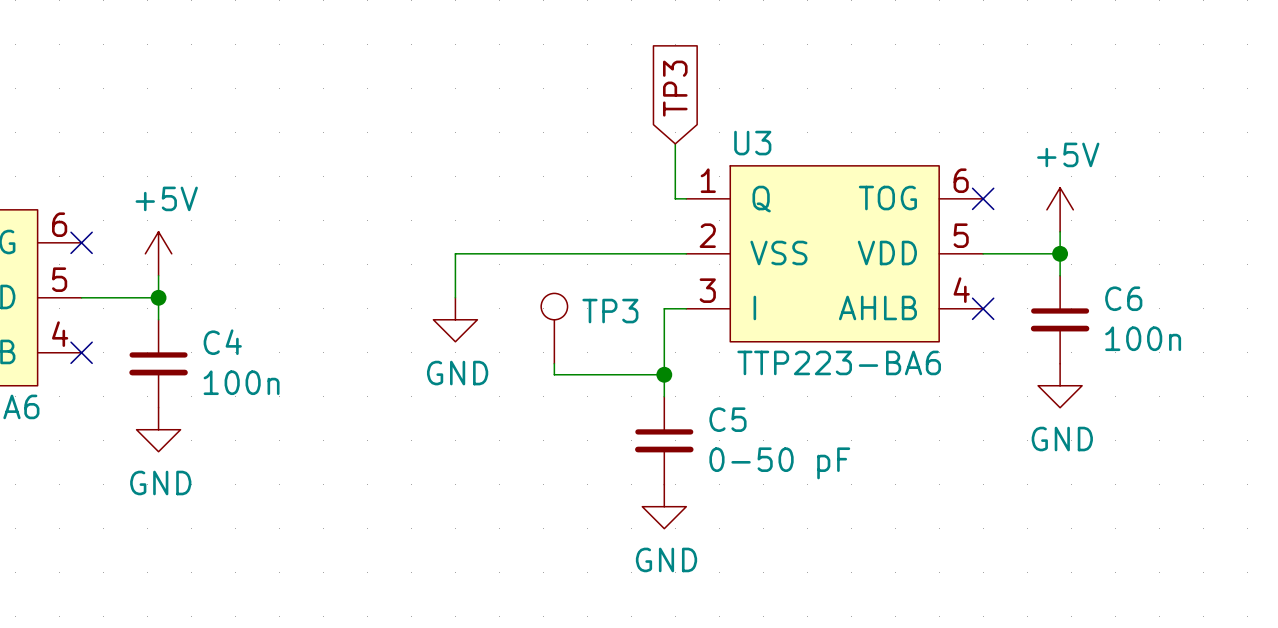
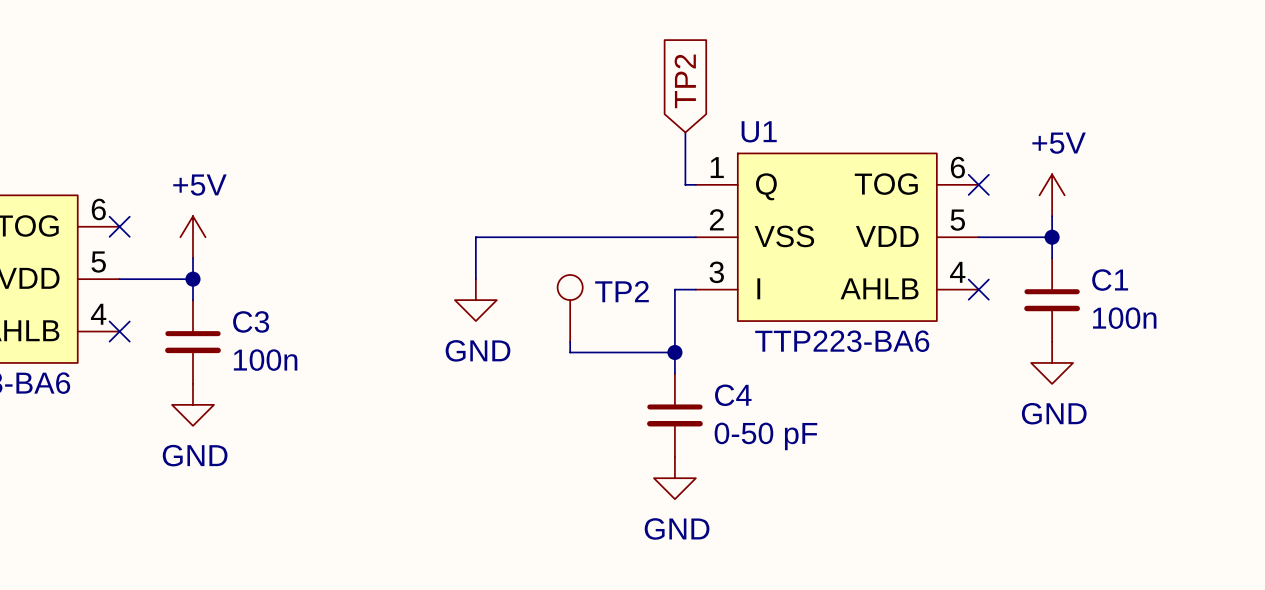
global label: TP3 (675, 88) -> TP2 (685, 81)
U3 name: U3 (752, 143) -> U1 (759, 131)
C6 name: C6 (1123, 298) -> C1 (1110, 280)
TP3 name: TP3 (610, 311) -> TP2 (621, 291)
C4 name: C4 (222, 342) -> C3 (251, 321)
C5 name: C5 (727, 419) -> C4 (733, 395)

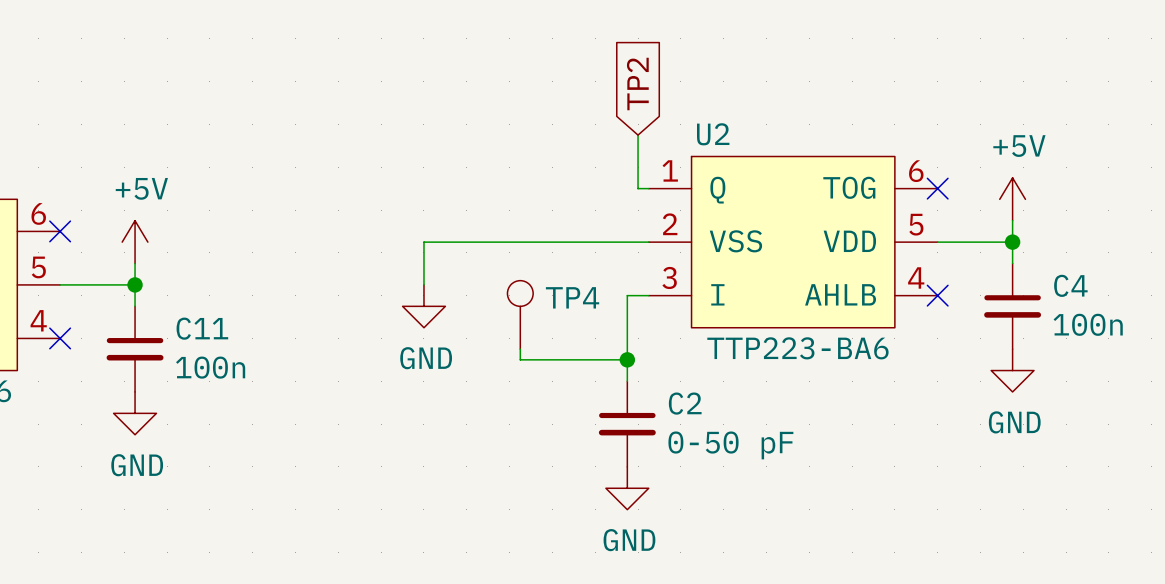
U1 name: U1 (759, 131) -> U2 (713, 134)
C1 name: C1 (1110, 280) -> C4 (1070, 285)
TP2 name: TP2 (621, 291) -> TP4 (572, 297)
C3 name: C3 (251, 321) -> C11 (202, 328)
C4 name: C4 (733, 395) -> C2 (685, 403)

